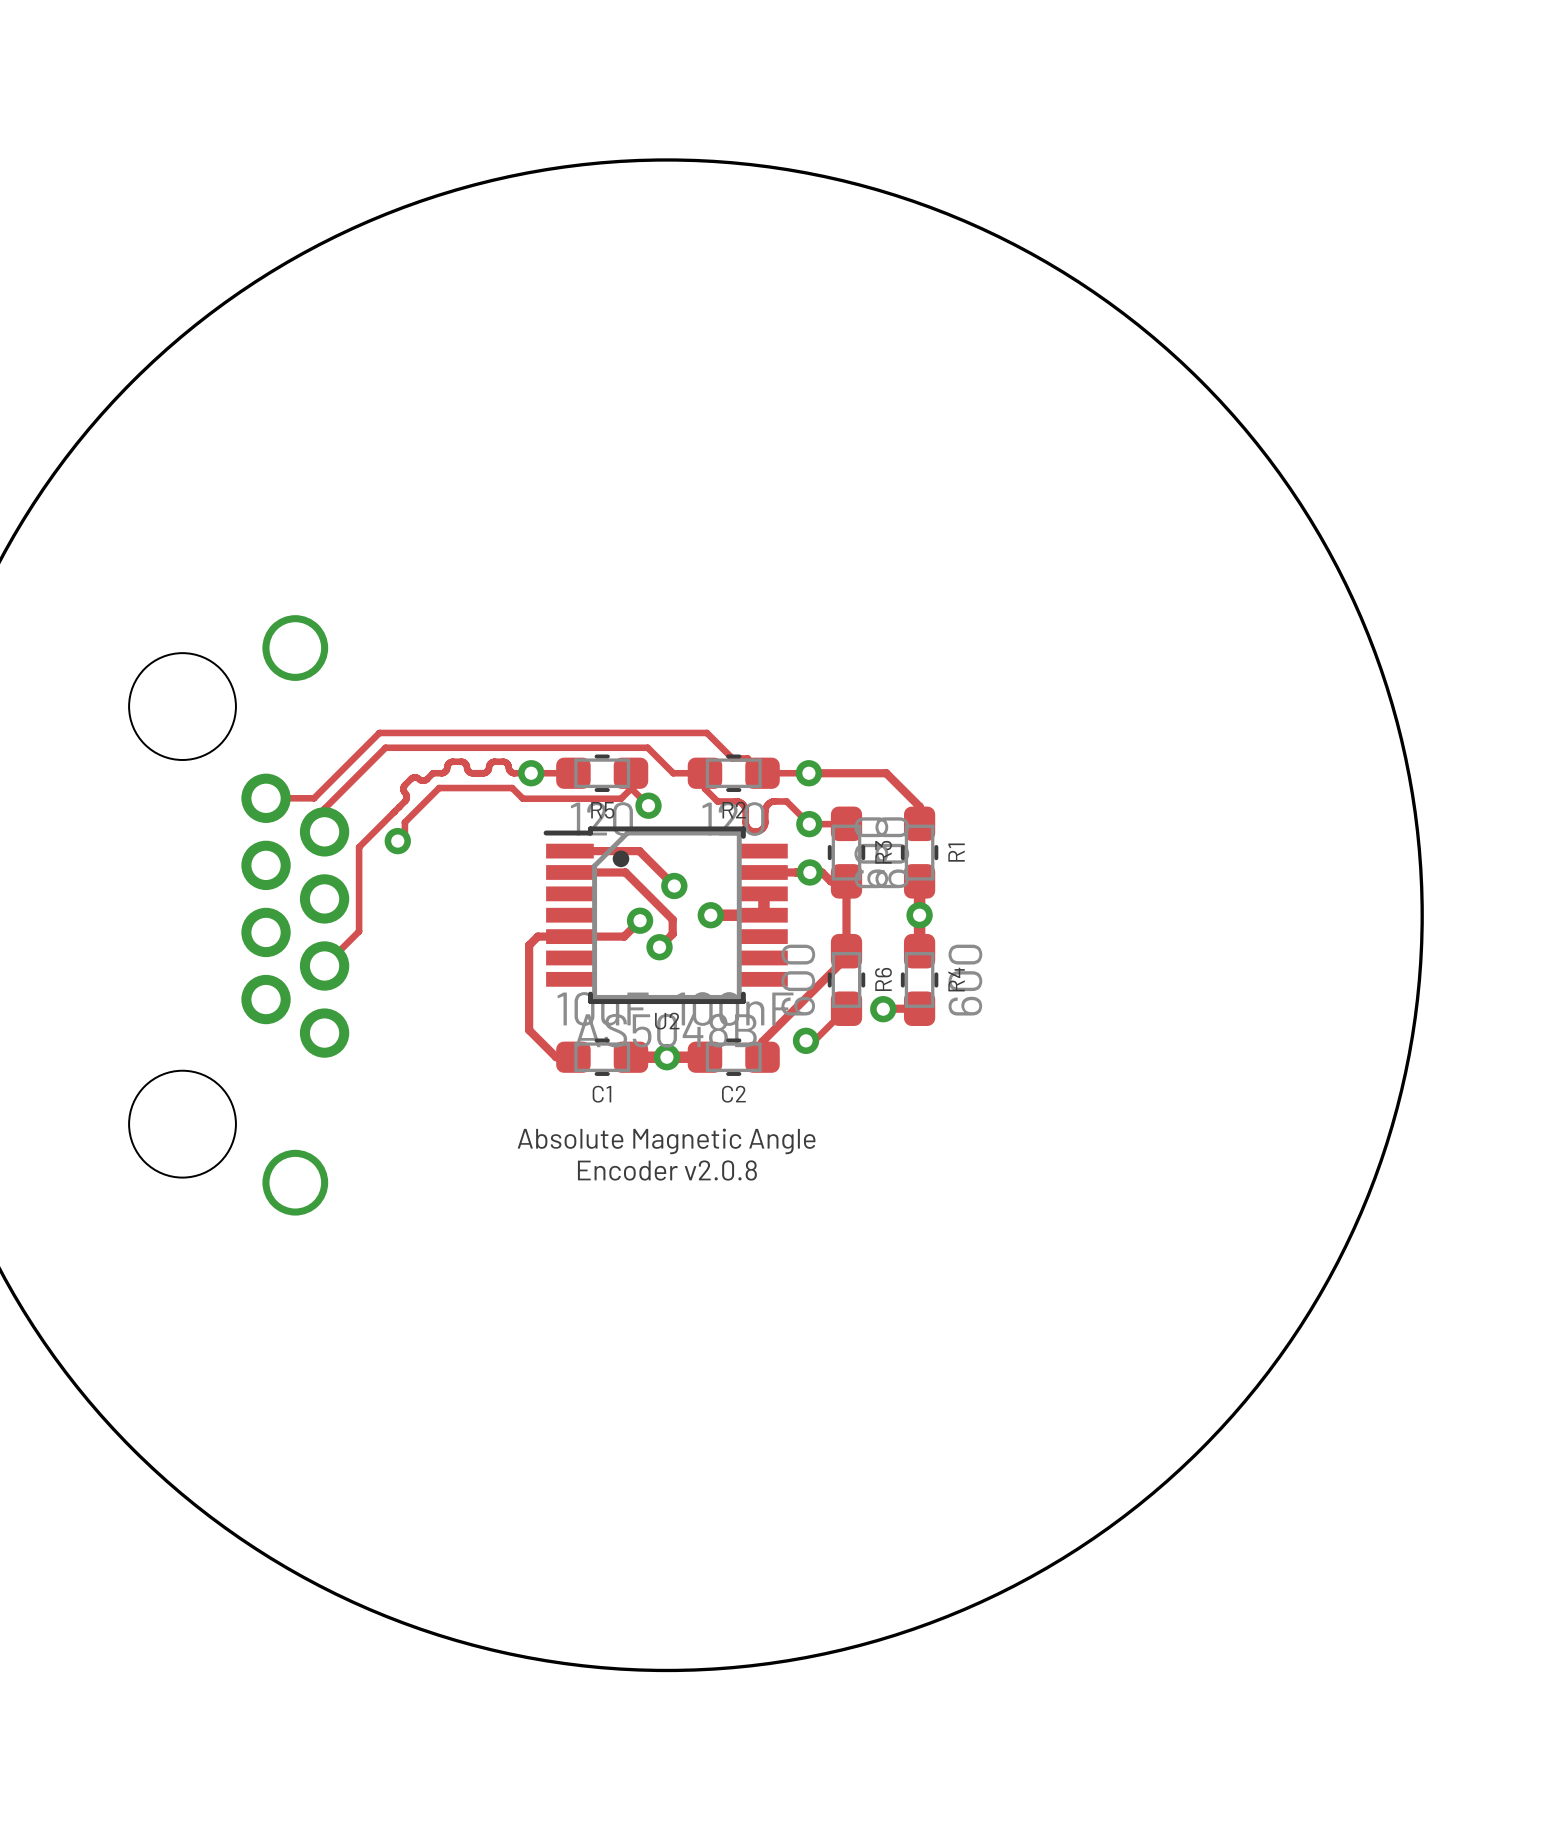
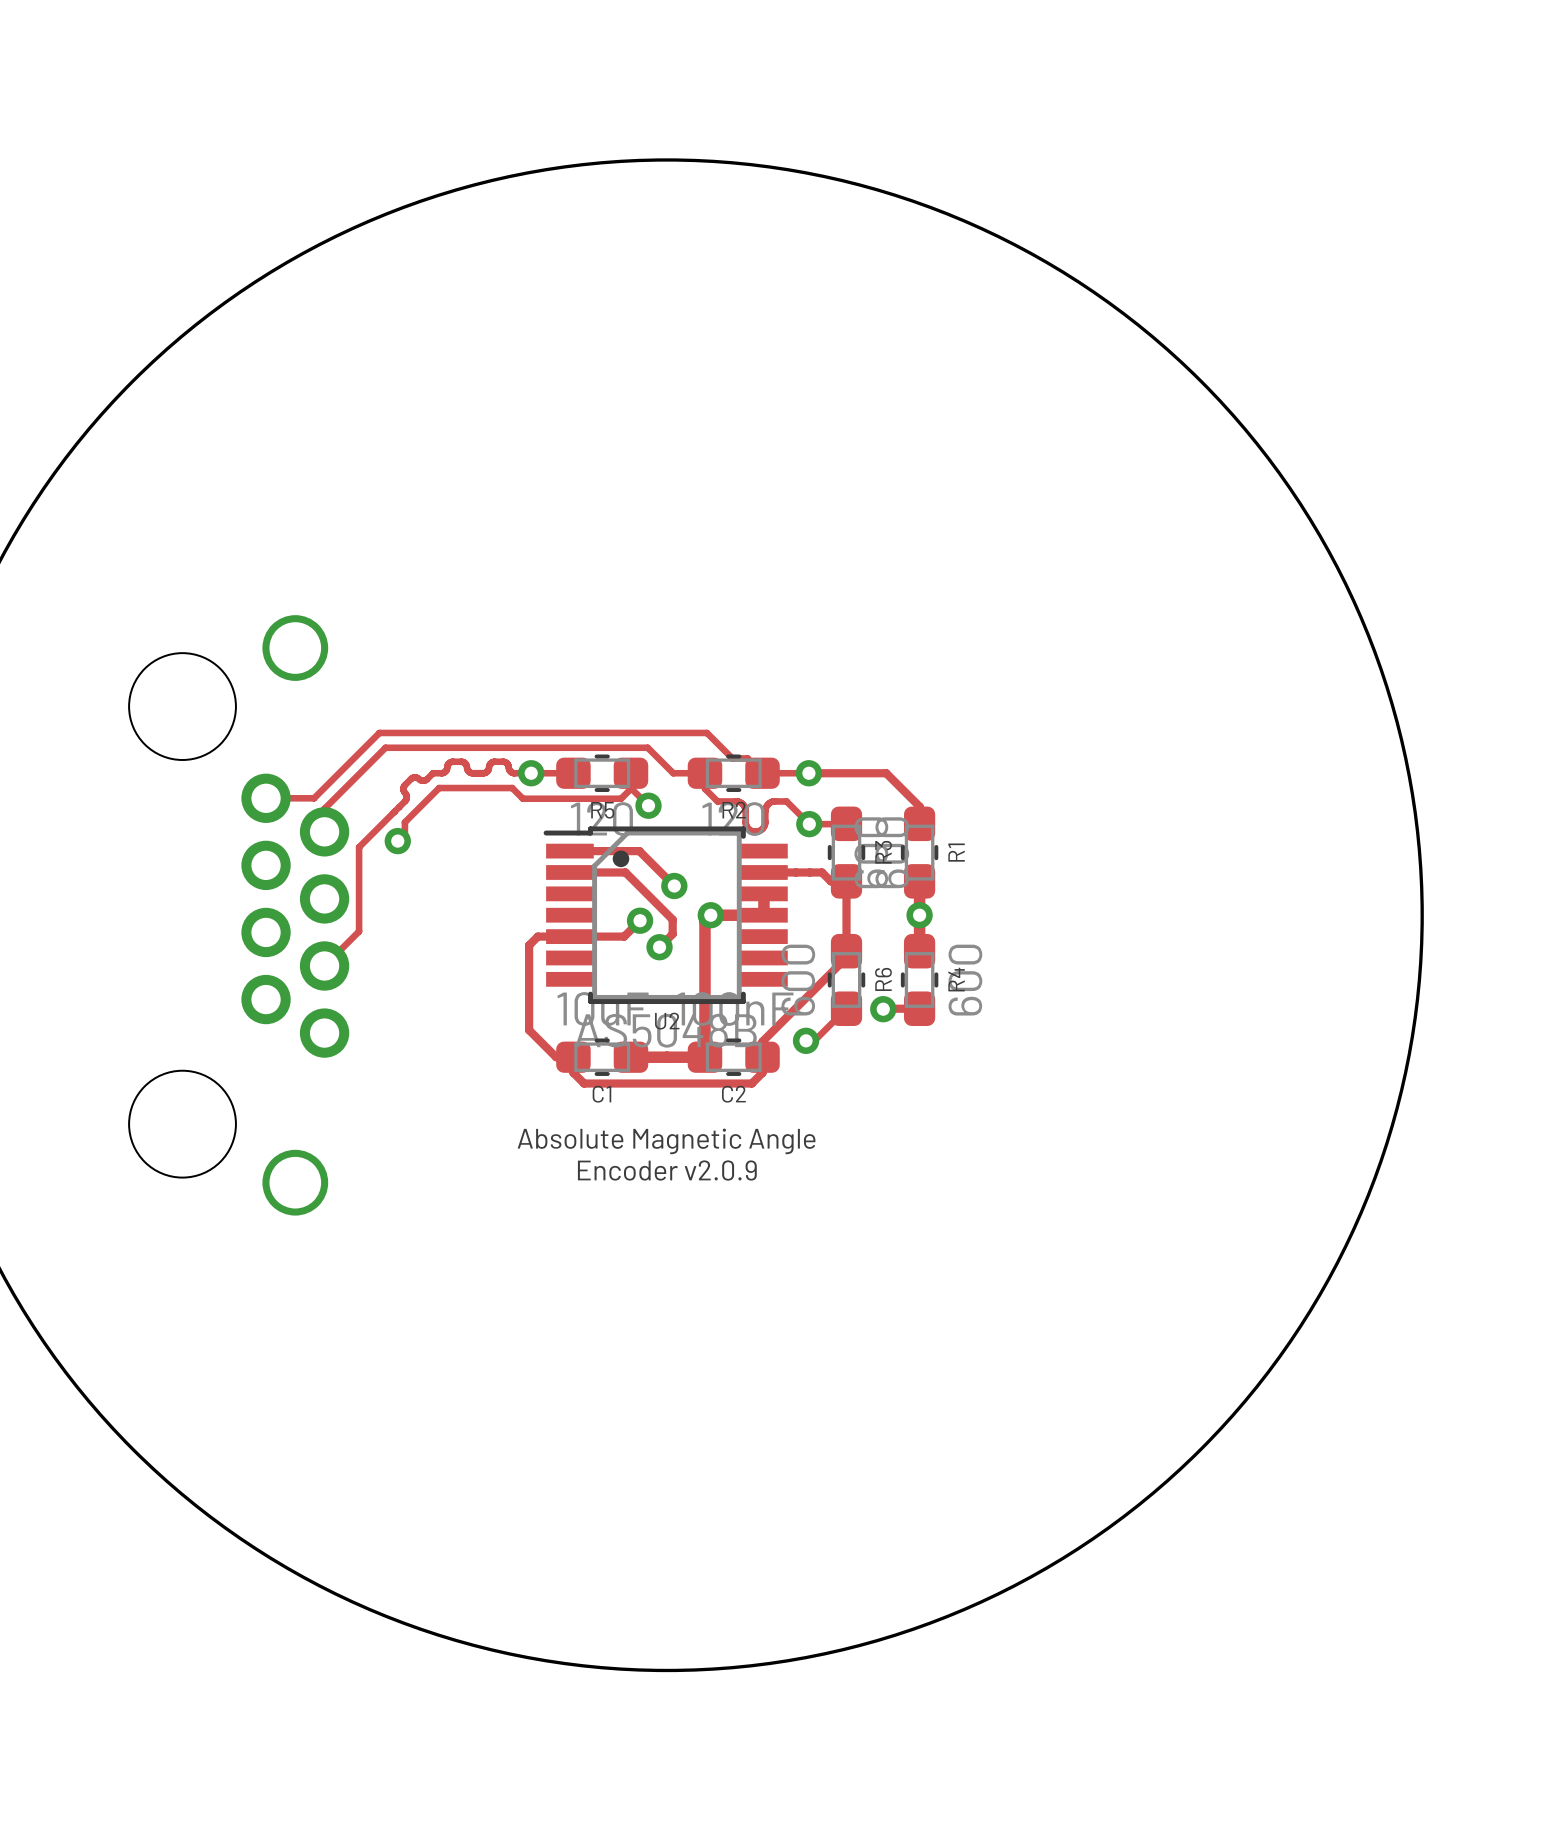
via: (809, 872) -> none
track: none -> (710, 915) (704, 921) (704, 1057)
track: none -> (573, 1057) (573, 1072) (584, 1083) (751, 1083) (762, 1072) (762, 1057)
via: (666, 1057) -> none
text: Encoder v2.0.8 (667, 1170) -> Encoder v2.0.9 (667, 1170)

